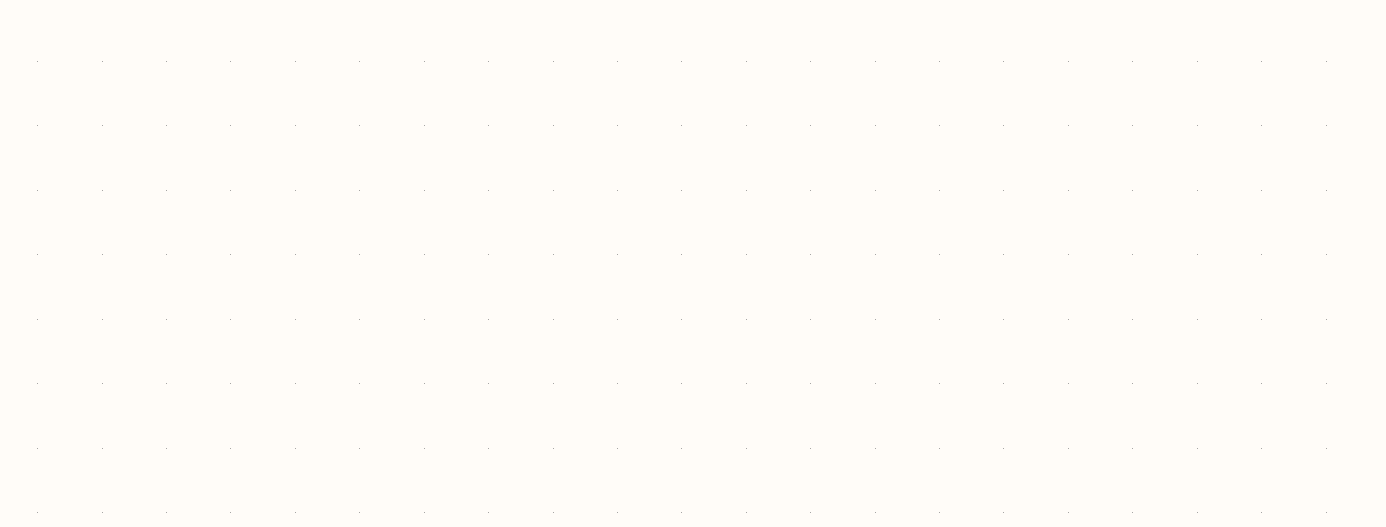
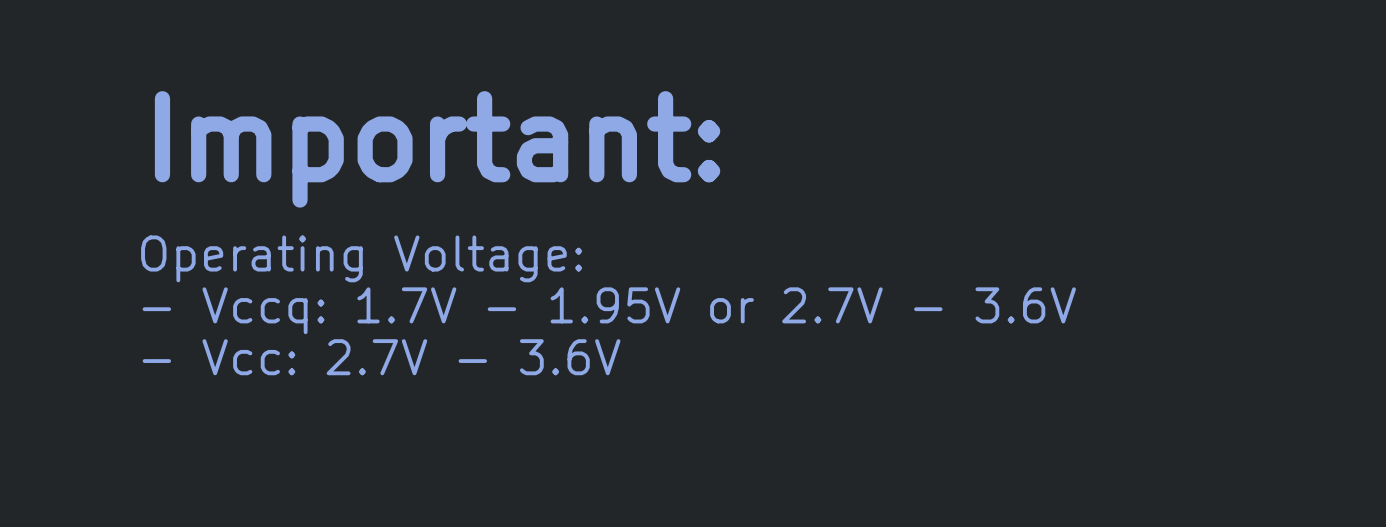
text: none -> Important: (437, 149)
text: none -> Operating Voltage: (361, 258)
text: none -> - Vccq: 1.7V - 1.95V or 2.7V - 3.6V (609, 310)
text: none -> - Vcc: 2.7V - 3.6V (381, 357)

